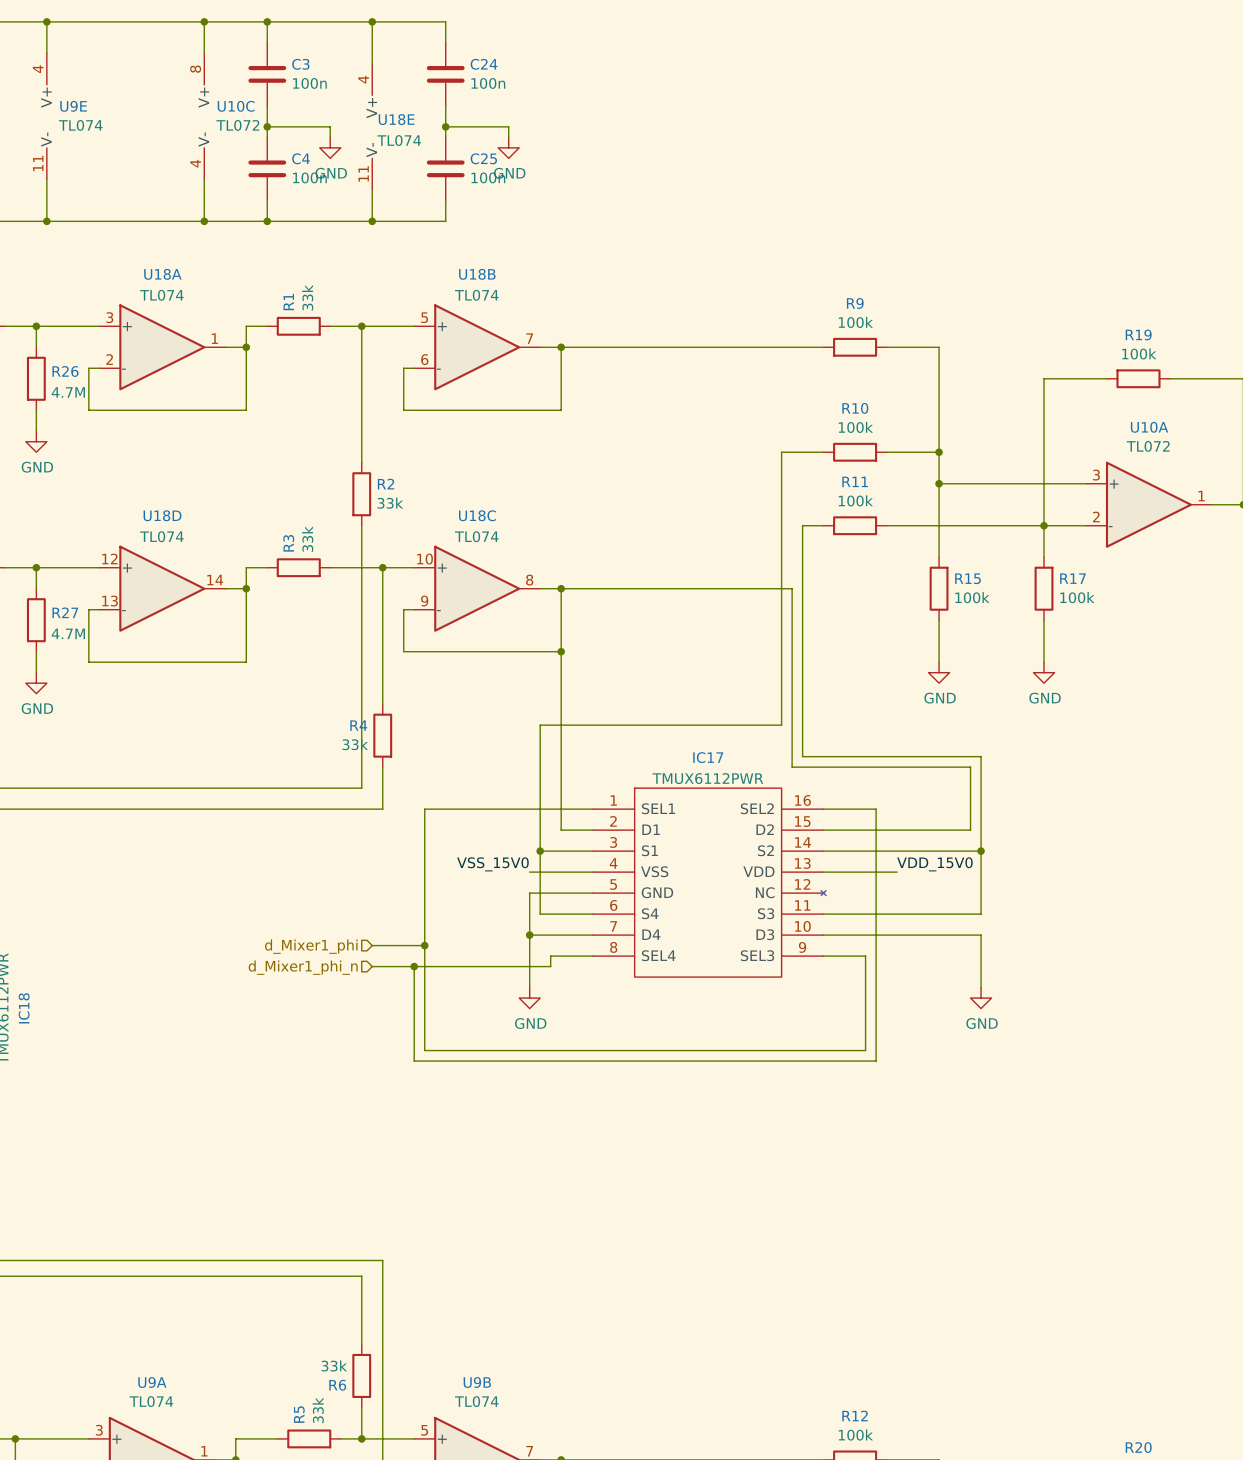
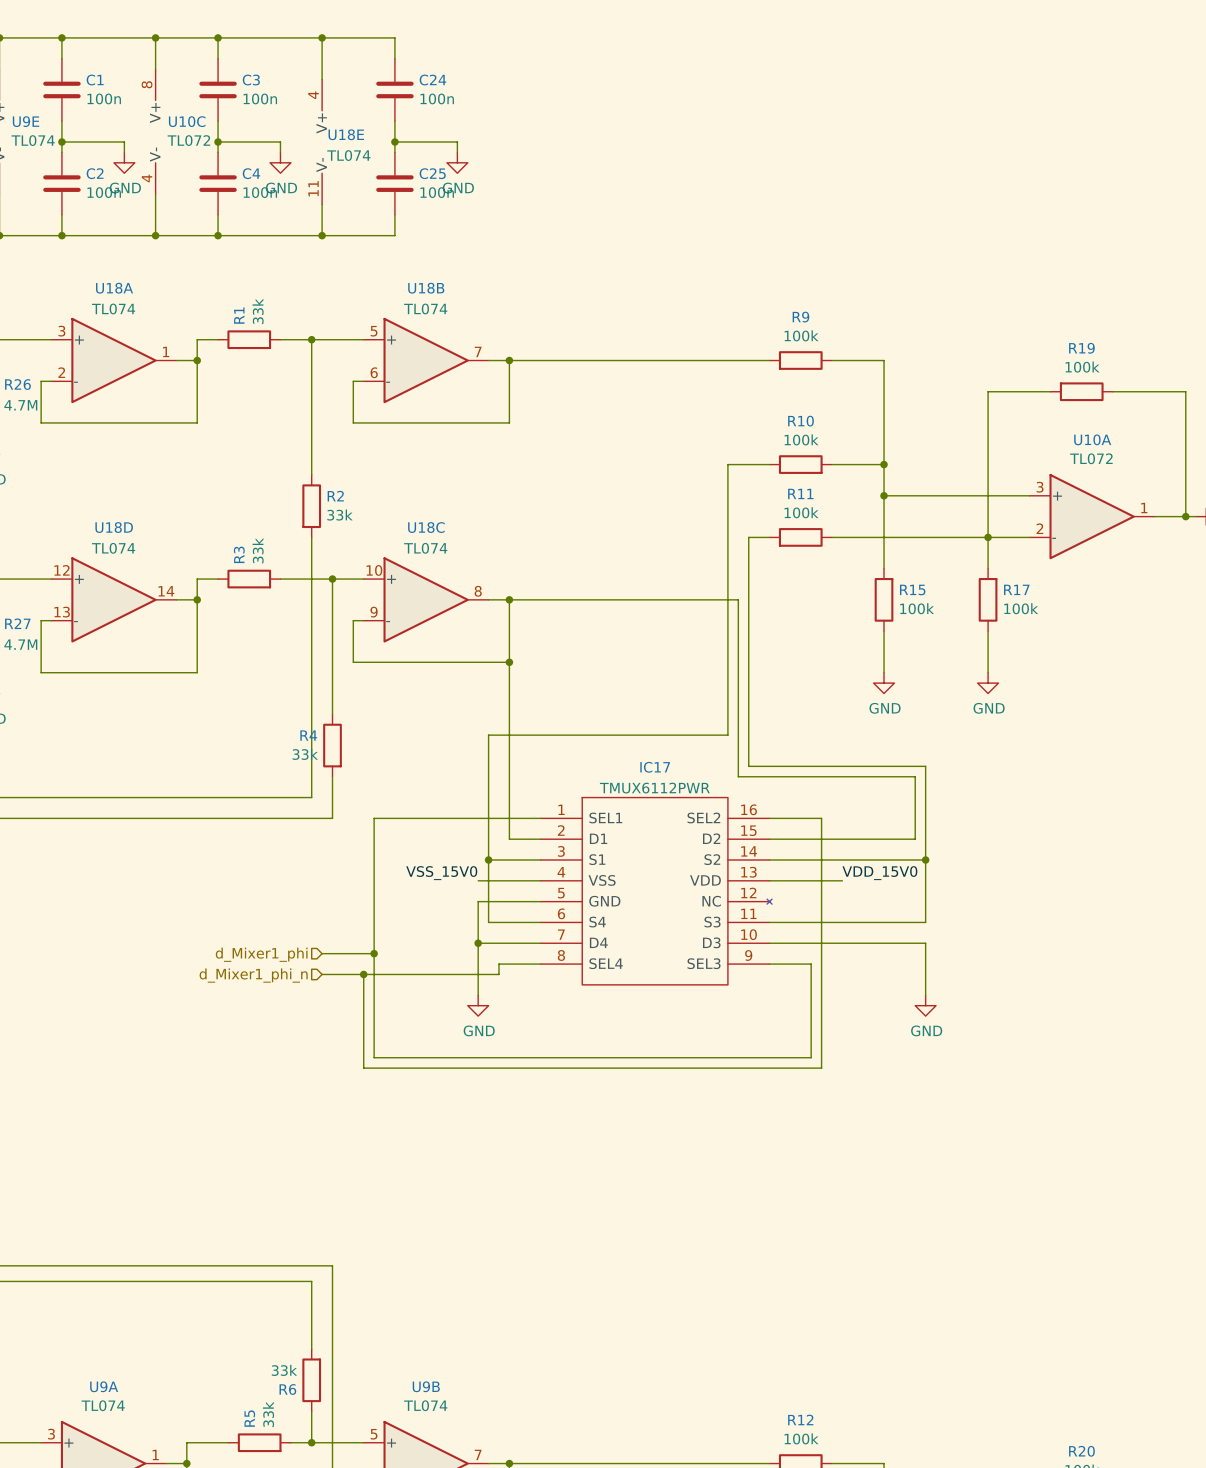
wire: none -> (61, 37) (61, 58)
junction: none -> (61, 37)
C1: none -> 100n (61, 89)
wire: none -> (61, 121) (61, 152)
wire: none -> (61, 142) (124, 142) (124, 152)
junction: none -> (61, 142)
power symbol: none -> GND (124, 162)
C2: none -> 100n (61, 183)
wire: none -> (61, 214) (61, 235)
junction: none -> (61, 235)

